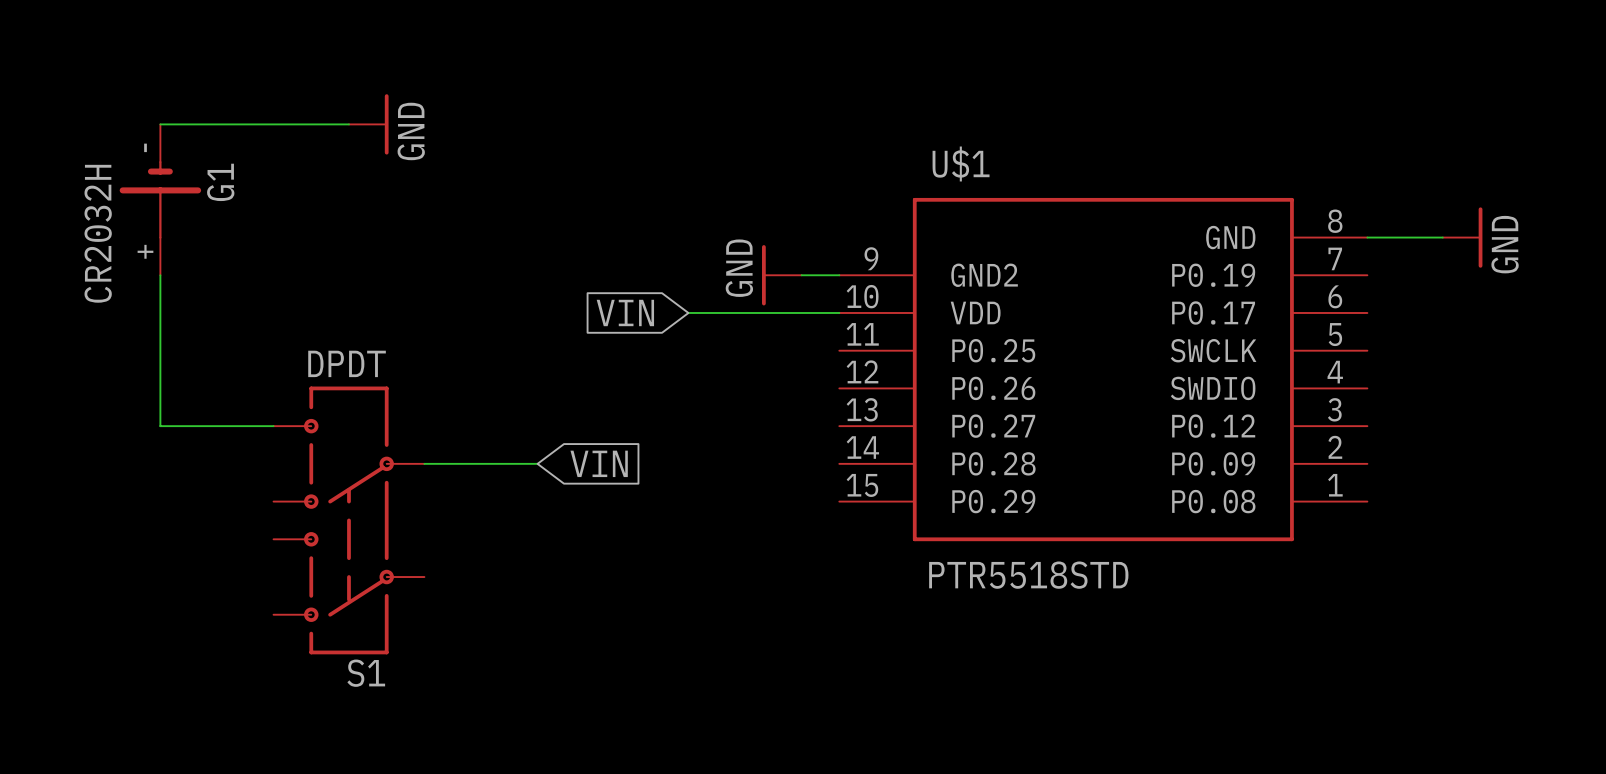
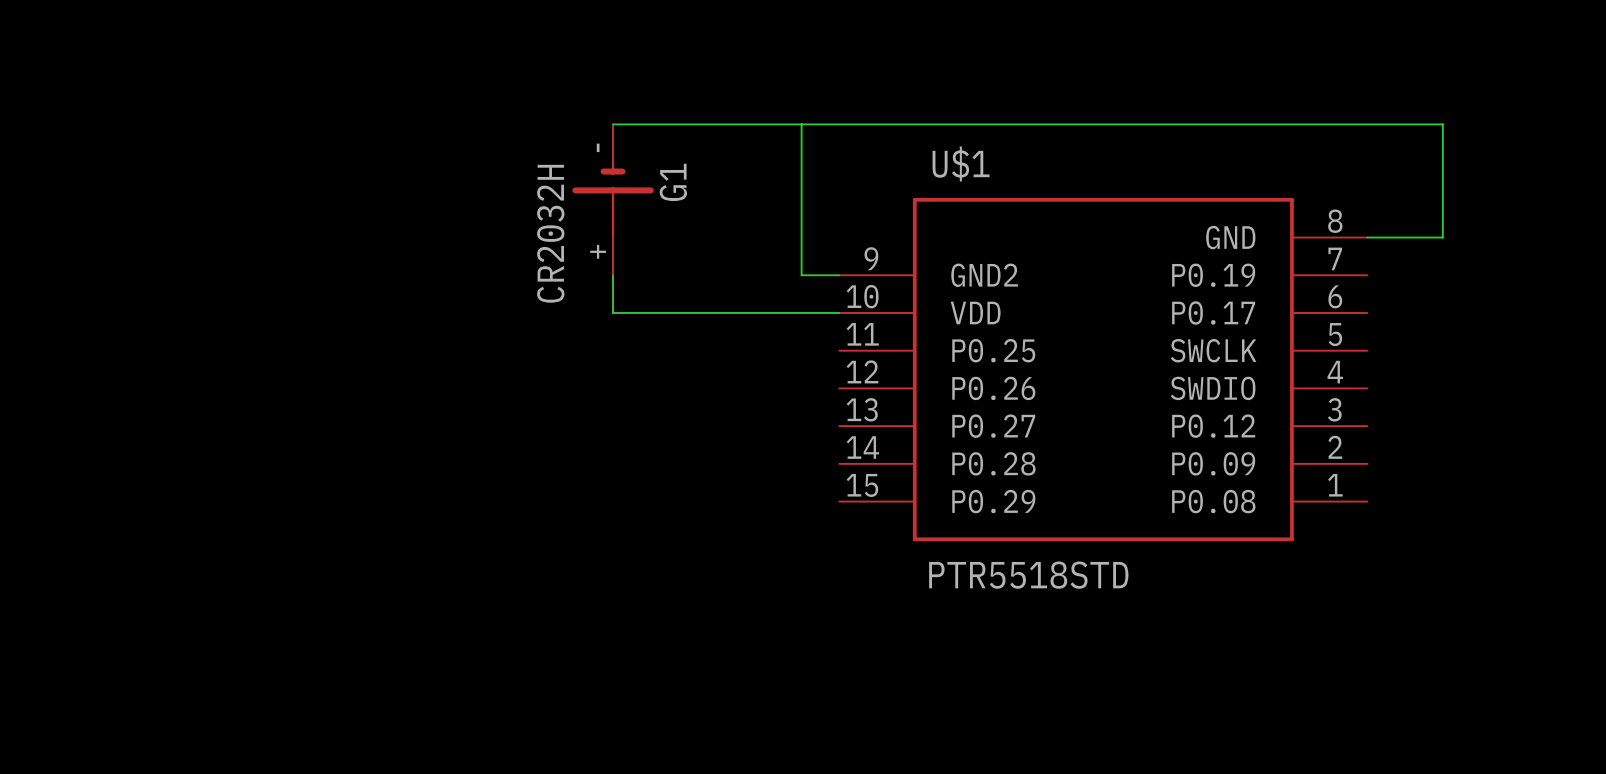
wire: (160, 124) (348, 124) -> none
power symbol: GND (368, 124) -> none
wire: none -> (613, 124) (1442, 124) (1442, 237)
wire: none -> (801, 124) (801, 275)
G1 position: (160, 199) -> (613, 199)
power symbol: GND (1462, 237) -> none
wire: (160, 275) (160, 426) (273, 426) -> none
wire: none -> (613, 275) (613, 312) (688, 312)
power symbol: GND (781, 275) -> none
global label: VIN (625, 312) -> none
wire: (424, 463) (537, 463) -> none
global label: VIN (599, 463) -> none
S1: DPDT (348, 520) -> none

